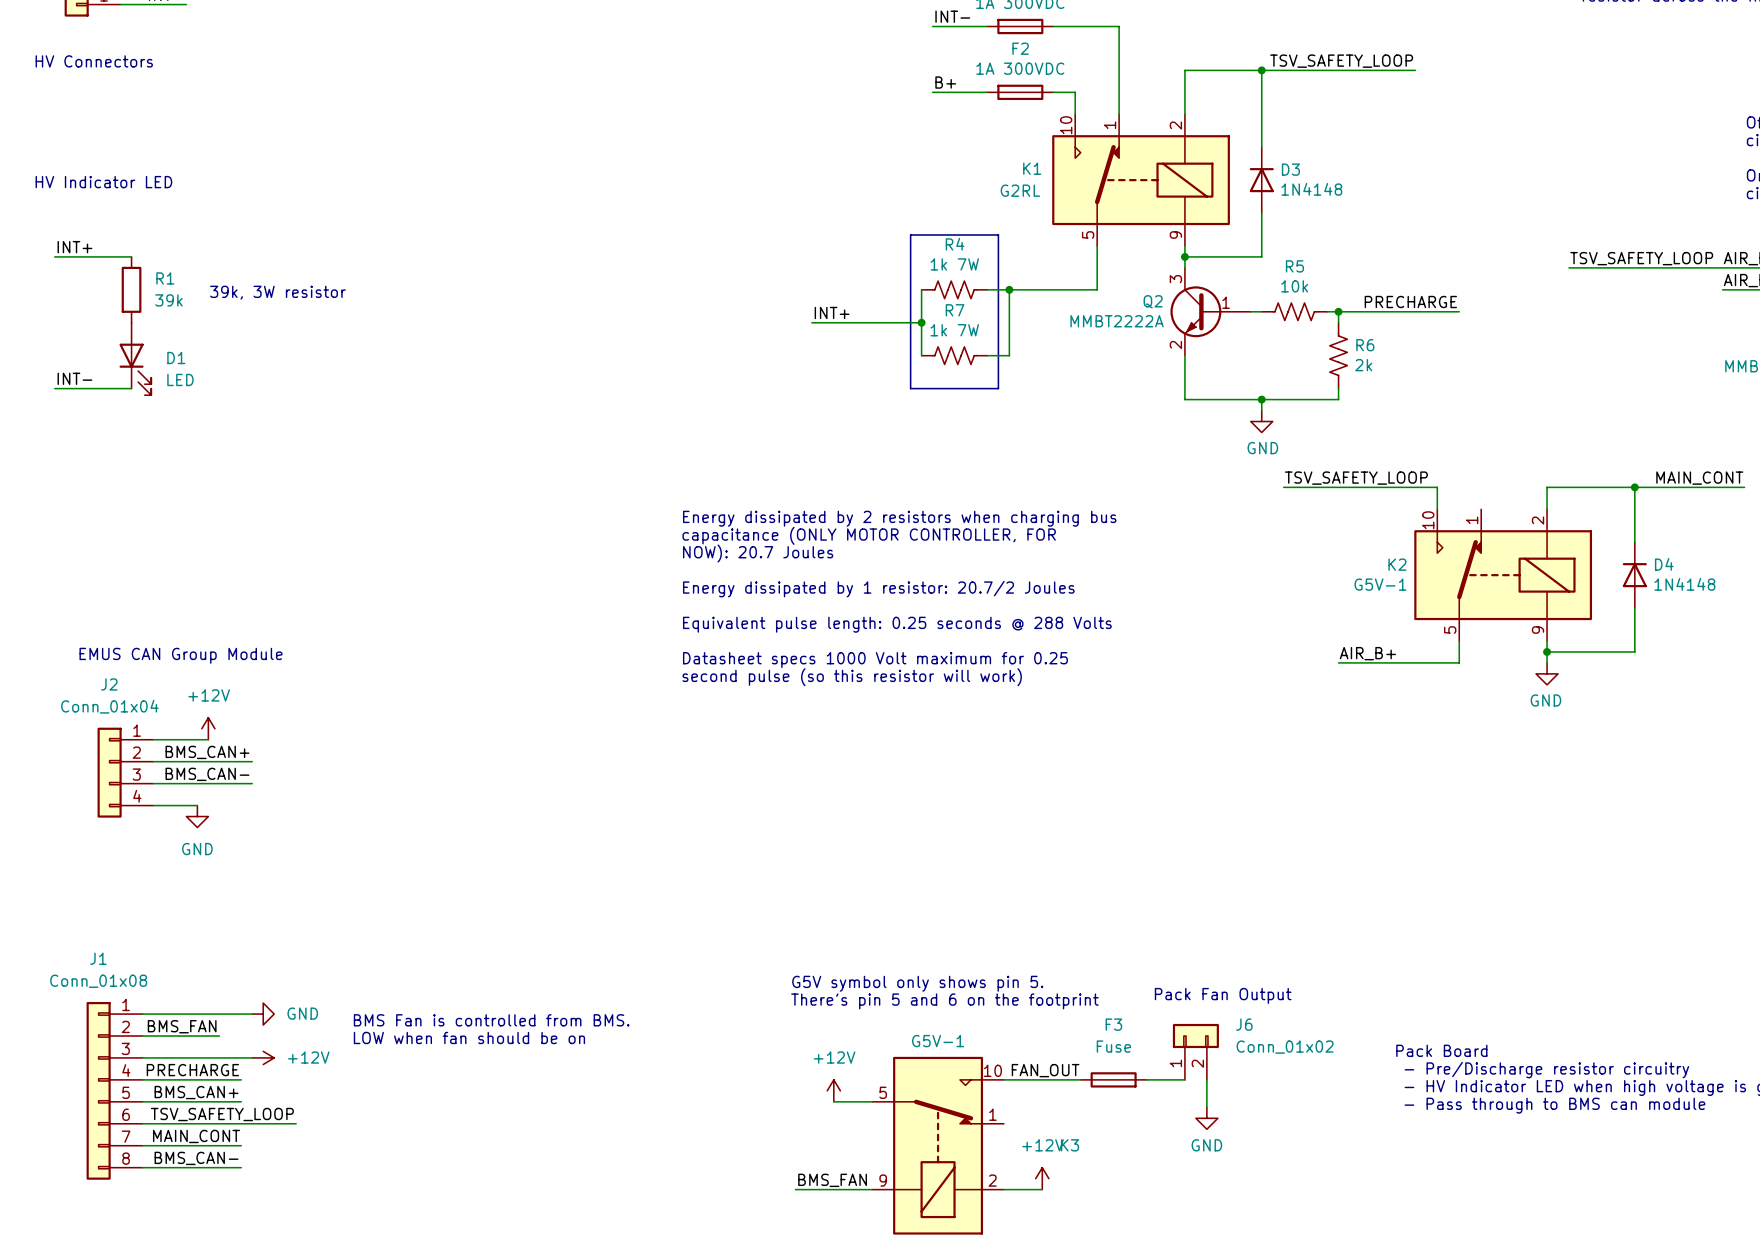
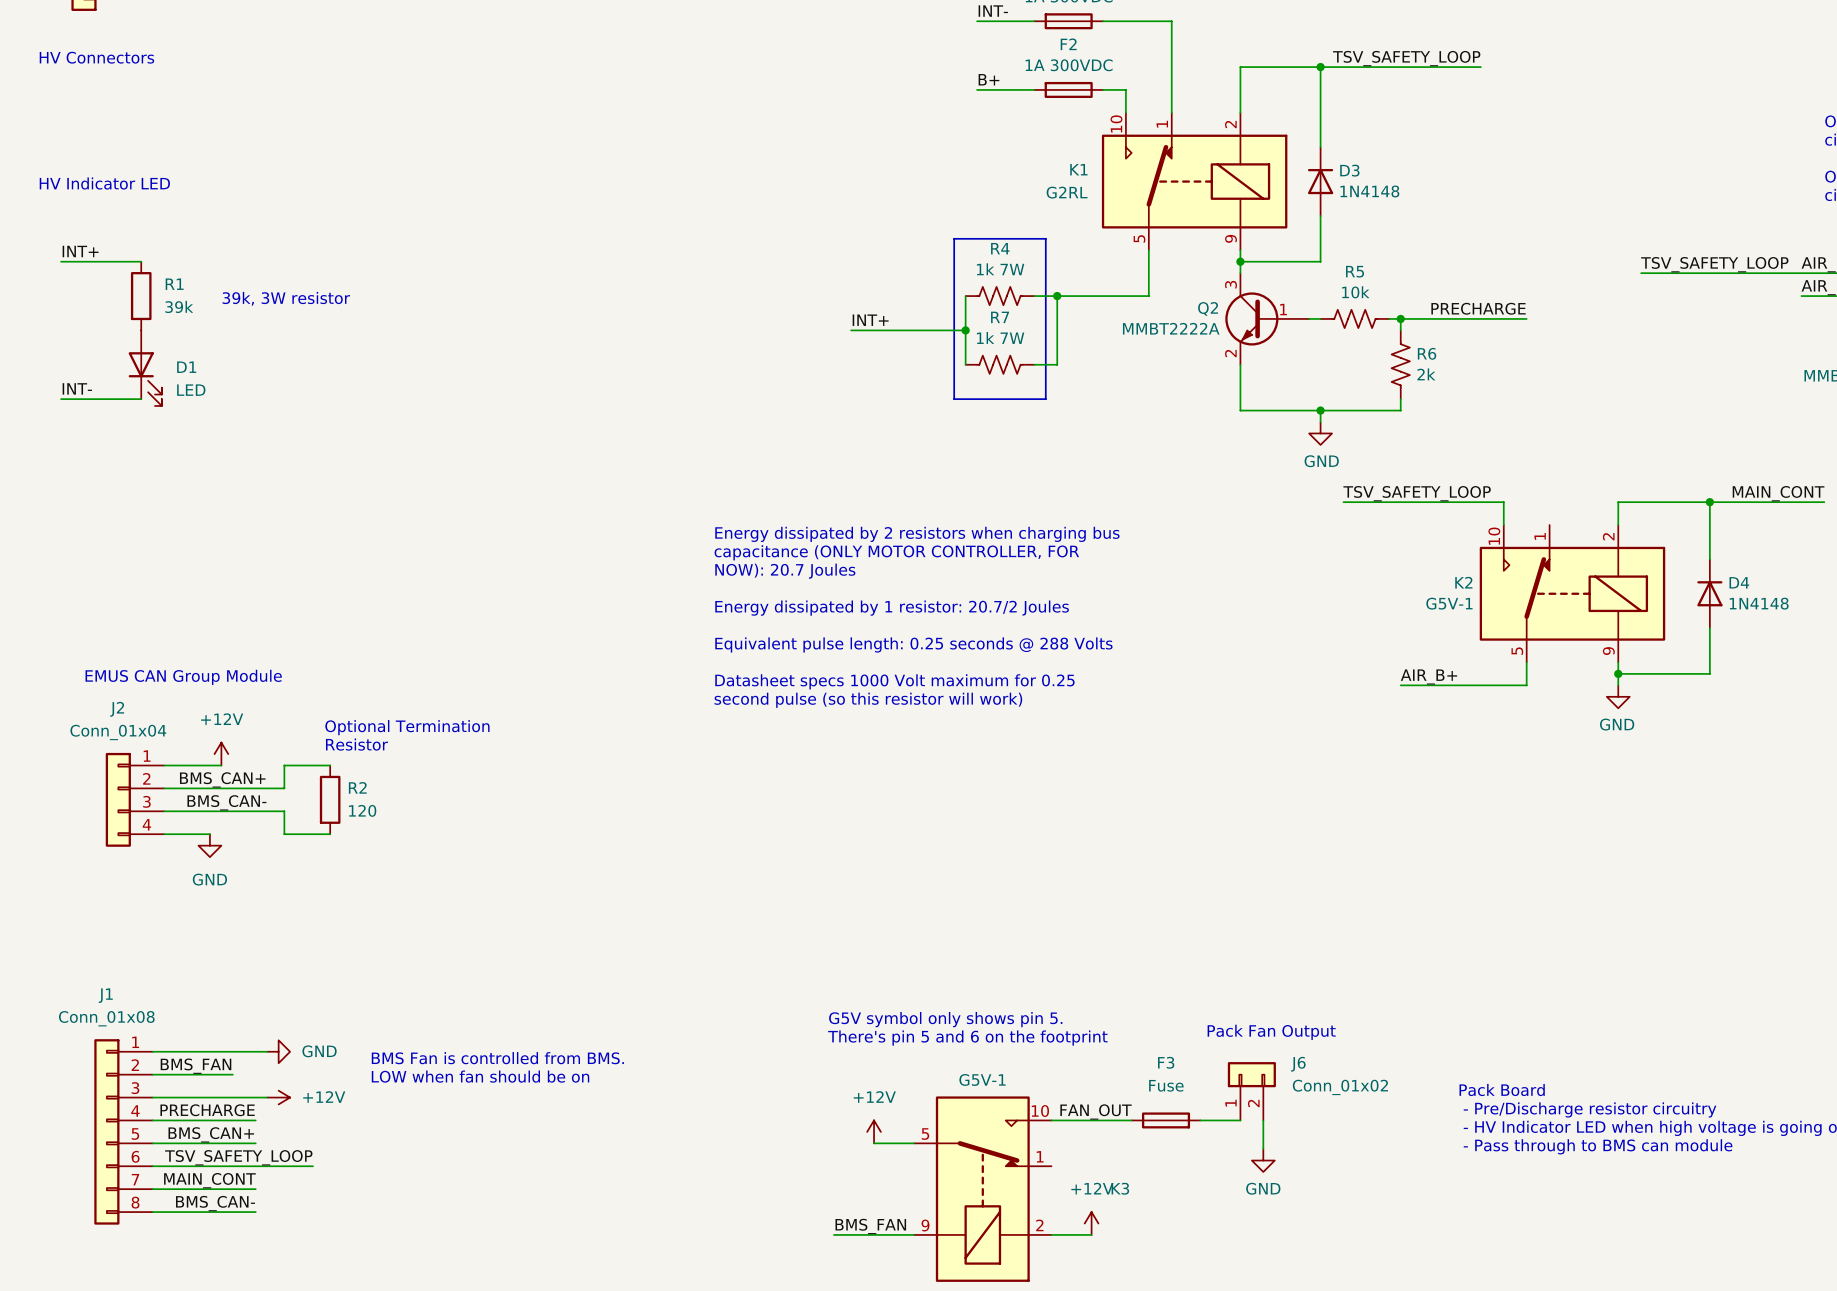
text: none -> Optional Termination (407, 727)
text: none -> Resistor (356, 744)
wire: none -> (330, 765) (284, 765) (284, 788) (267, 788)
R2: none -> 120 (330, 799)
wire: none -> (267, 811) (284, 811) (284, 834) (330, 834)

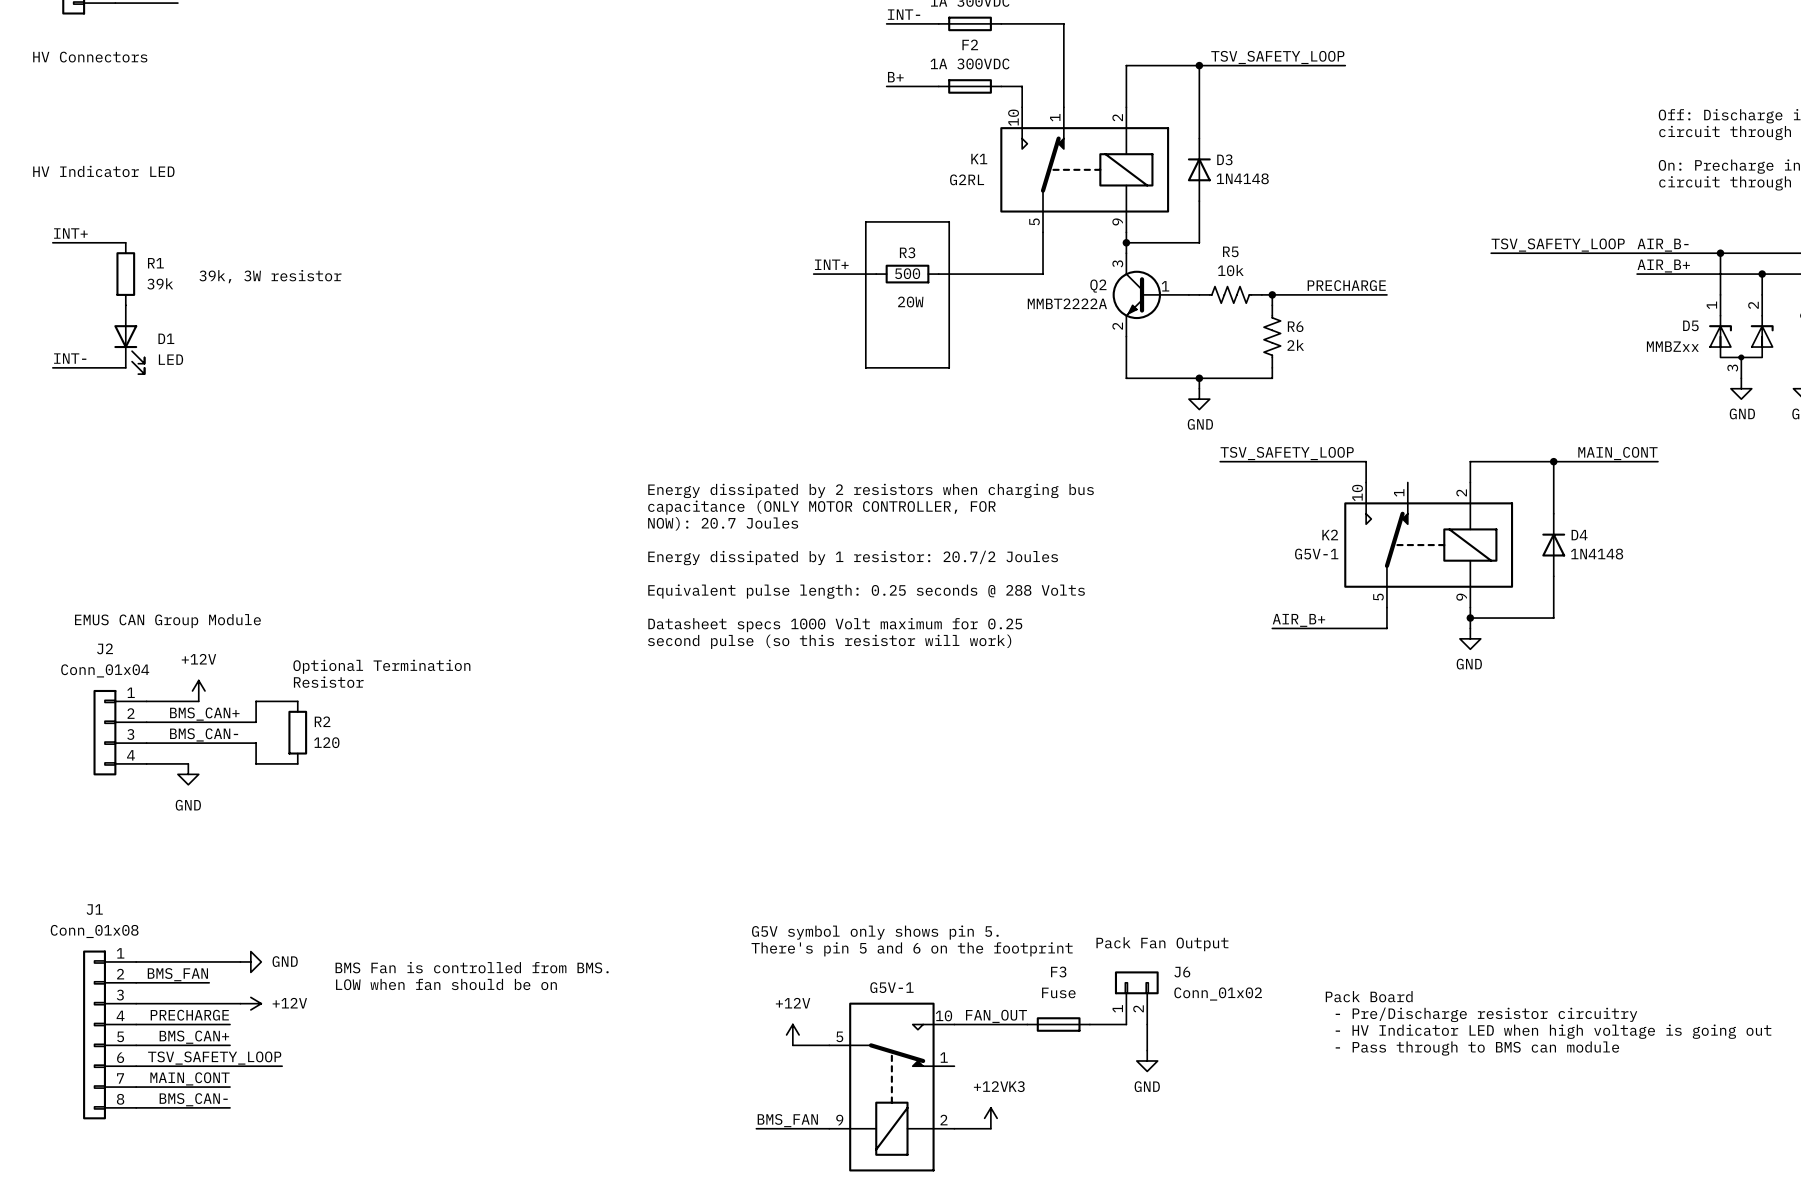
wire: (965, 296) (965, 364) -> (876, 274) (813, 274)
R4: 1k 7W (999, 296) -> none
R3: none -> 500 (907, 274)
wire: (1057, 296) (1057, 364) (1034, 364) -> none
junction: (1057, 296) -> none
label position: INT+ (870, 320) -> INT+ (831, 264)
text: none -> 20W (910, 302)
wire: (851, 330) (965, 330) -> none
junction: (965, 330) -> none
R7: 1k 7W (999, 364) -> none

